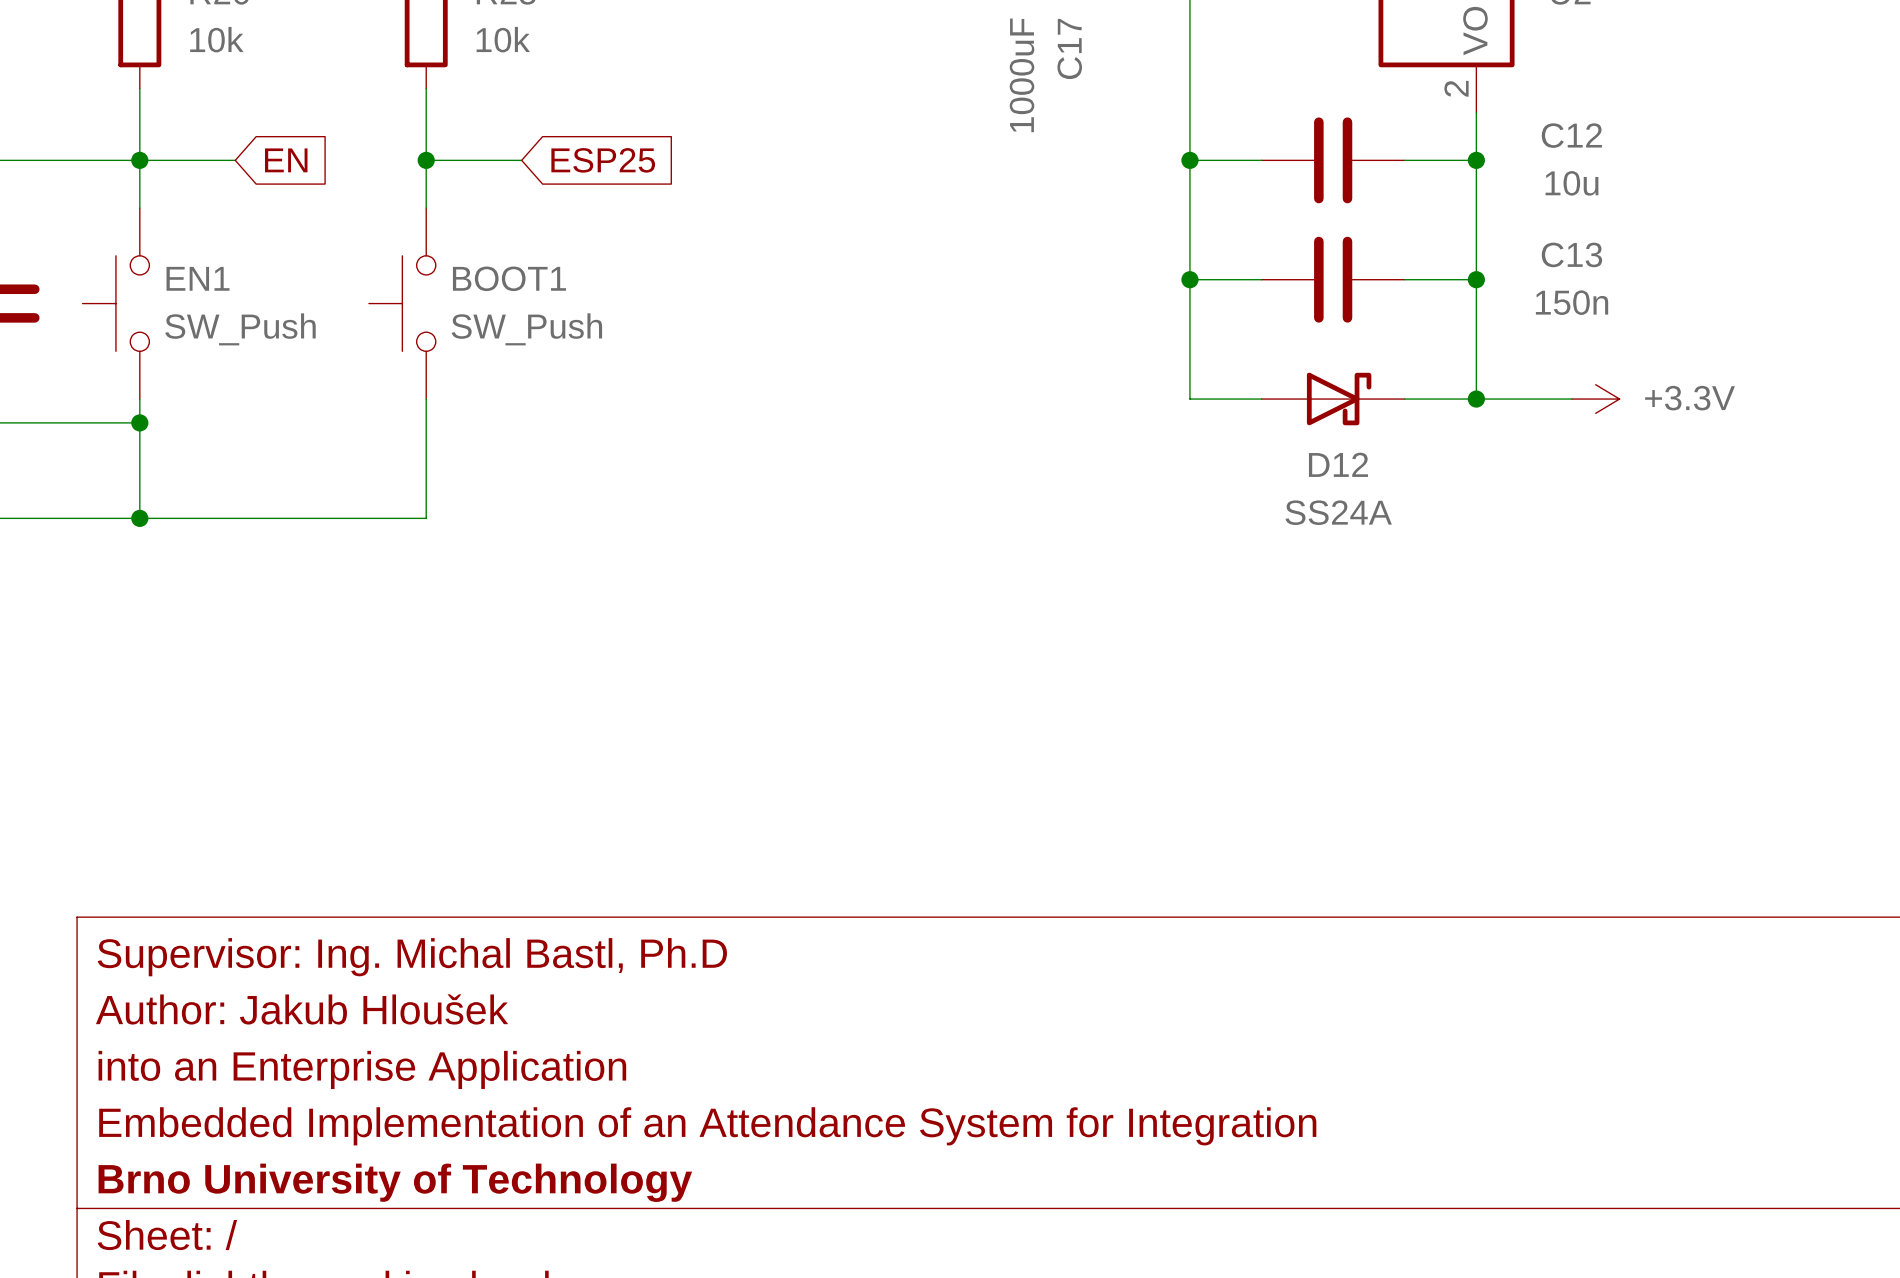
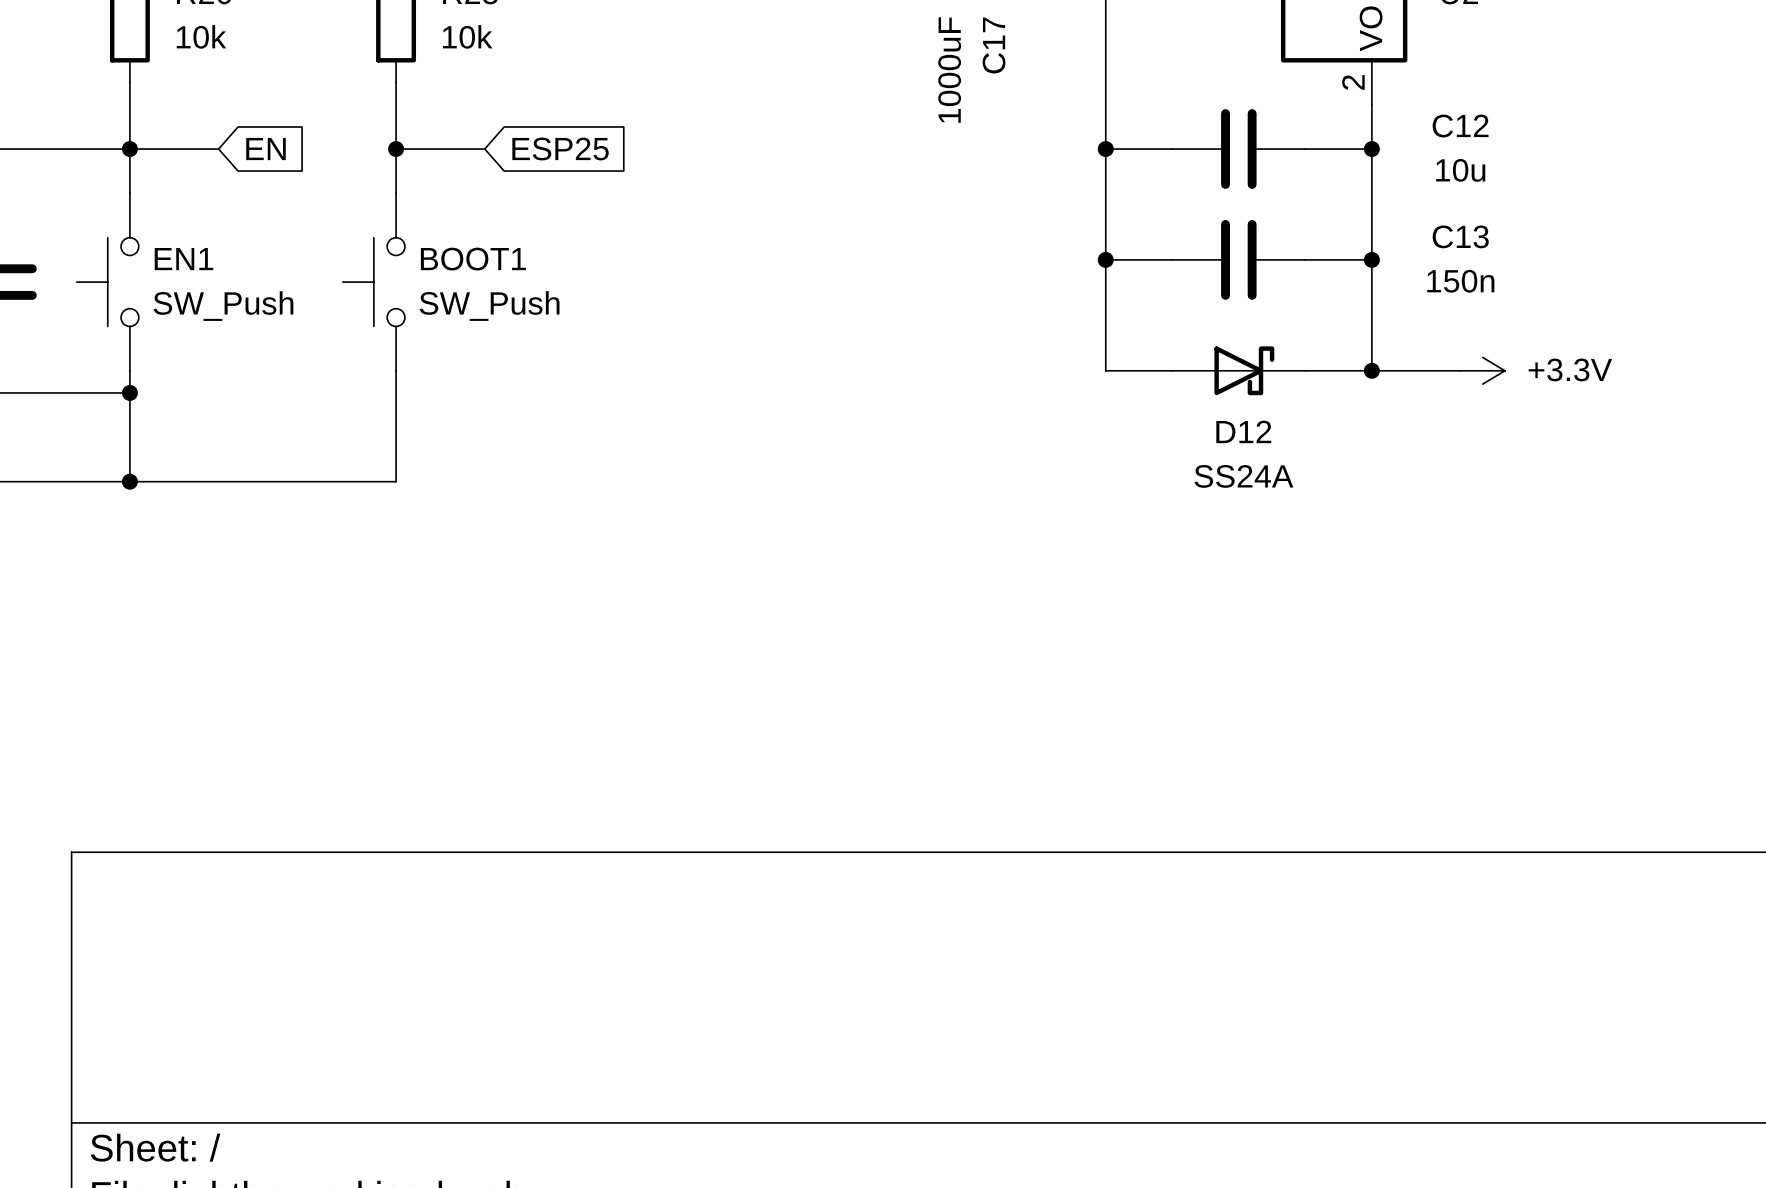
title block: Supervisor: Ing. Michal Bastl, Ph.D (412, 957) -> none
title block: Author: Jakub Hloušek (302, 1009) -> none
title block: into an Enterprise Application (362, 1069) -> none
title block: Embedded Implementation of an Attendance System for Integration (707, 1126) -> none
title block: Brno University of Technology (395, 1182) -> none

